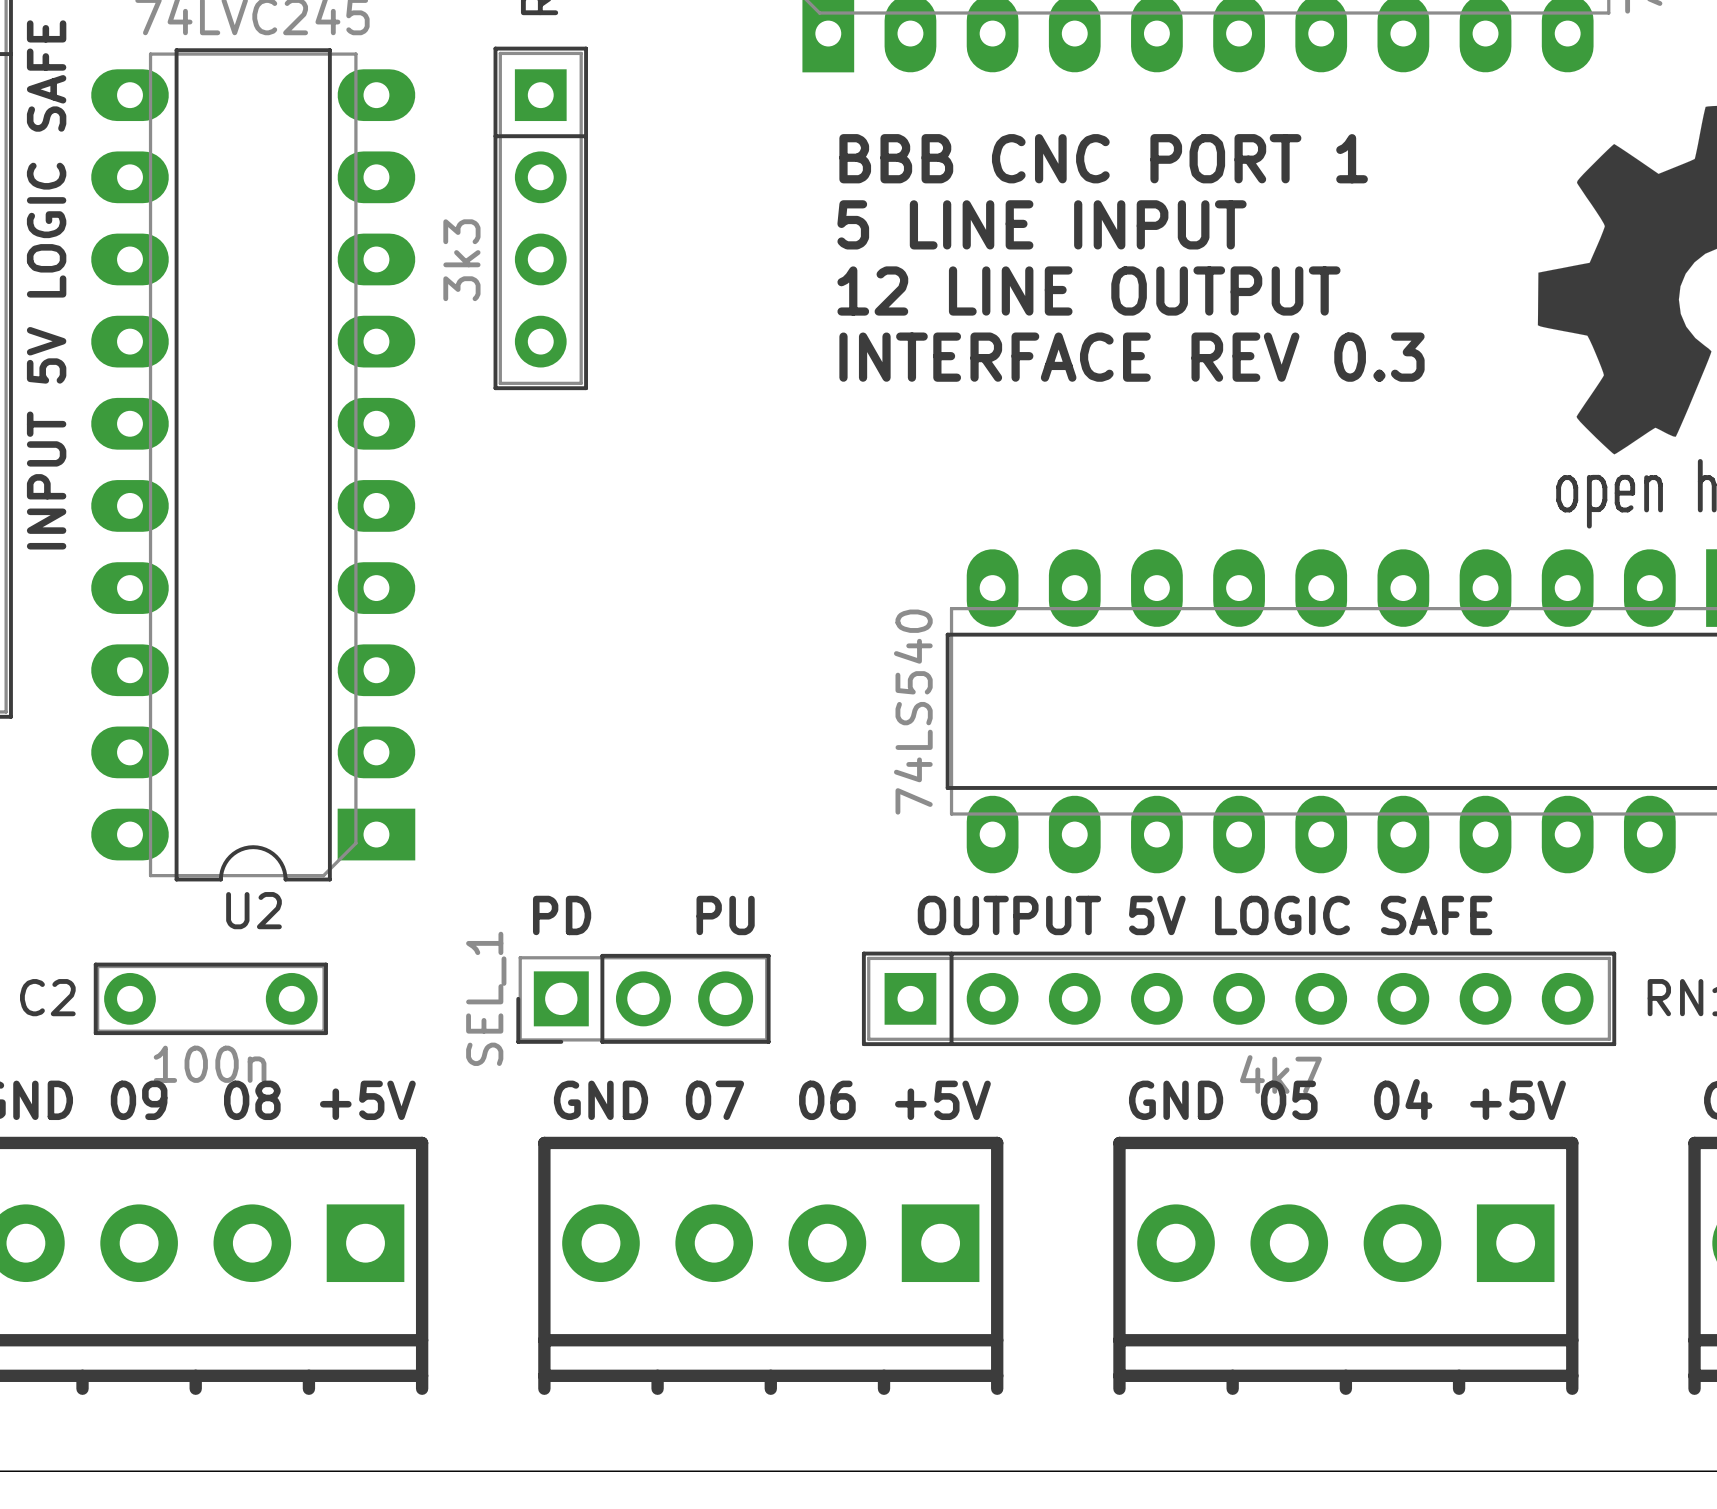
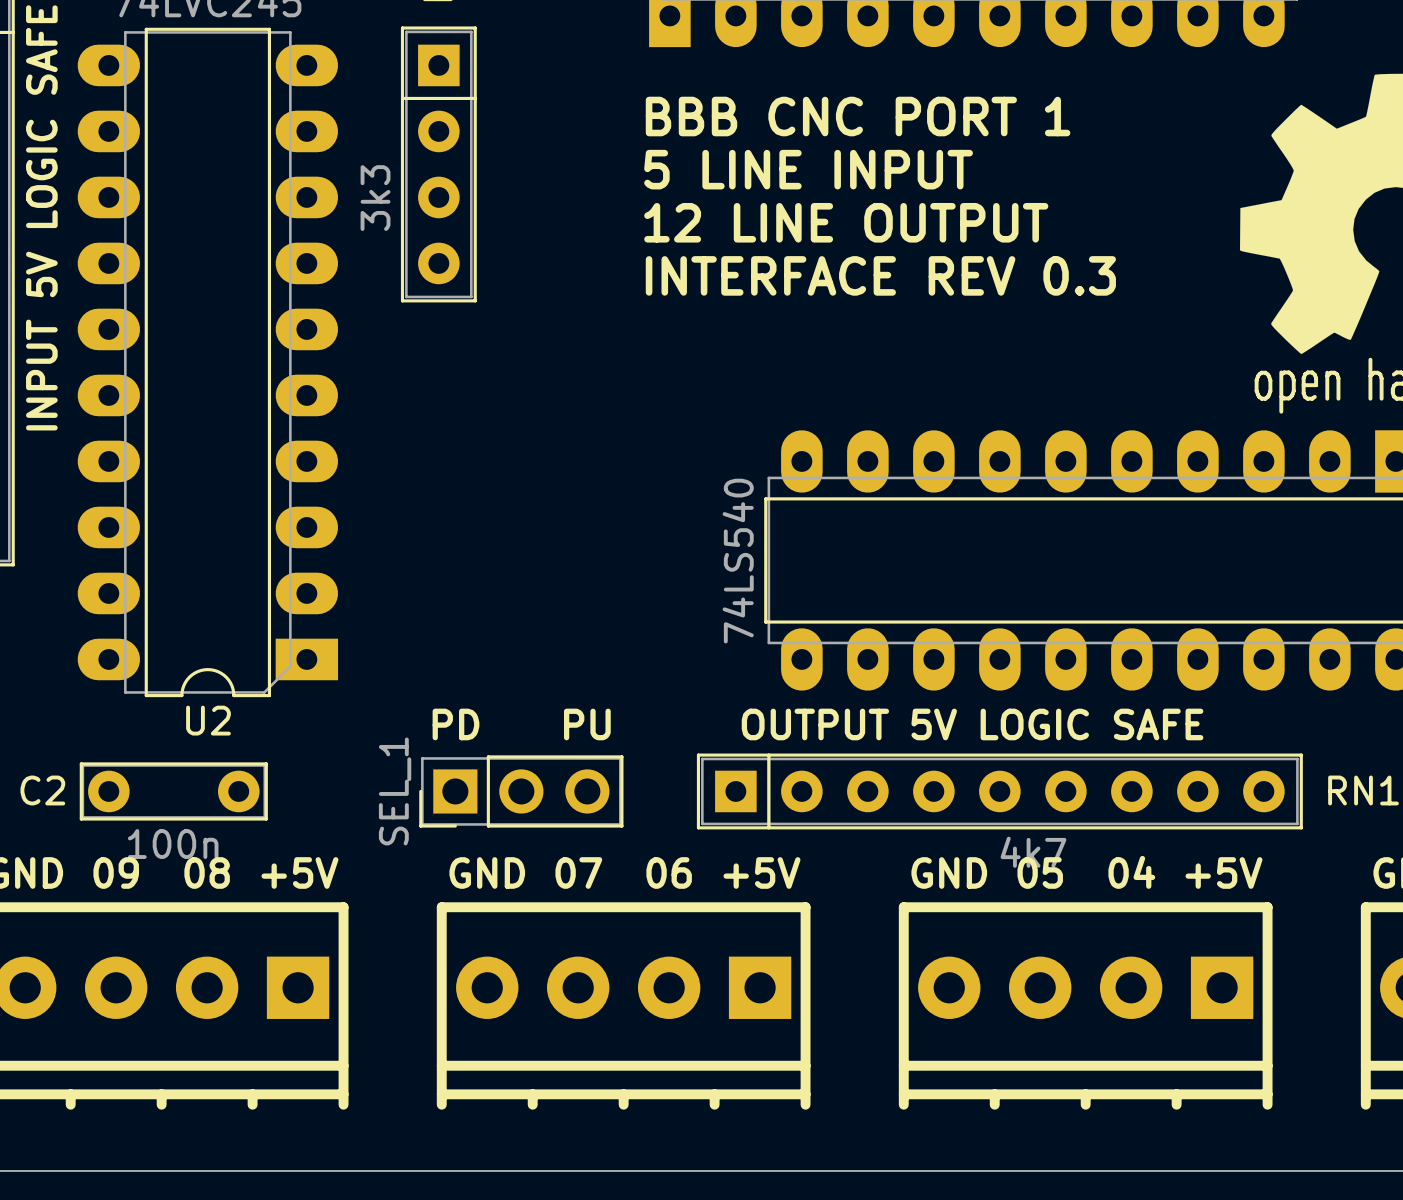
text position: BBB CNC PORT 1 (1103, 158) -> BBB CNC PORT 1 (858, 116)
text position: 5 LINE INPUT (1042, 224) -> 5 LINE INPUT (808, 169)
text position: 12 LINE OUTPUT (1088, 290) -> 12 LINE OUTPUT (846, 222)
text position: INTERFACE REV 0.3 (1132, 357) -> INTERFACE REV 0.3 (880, 275)

